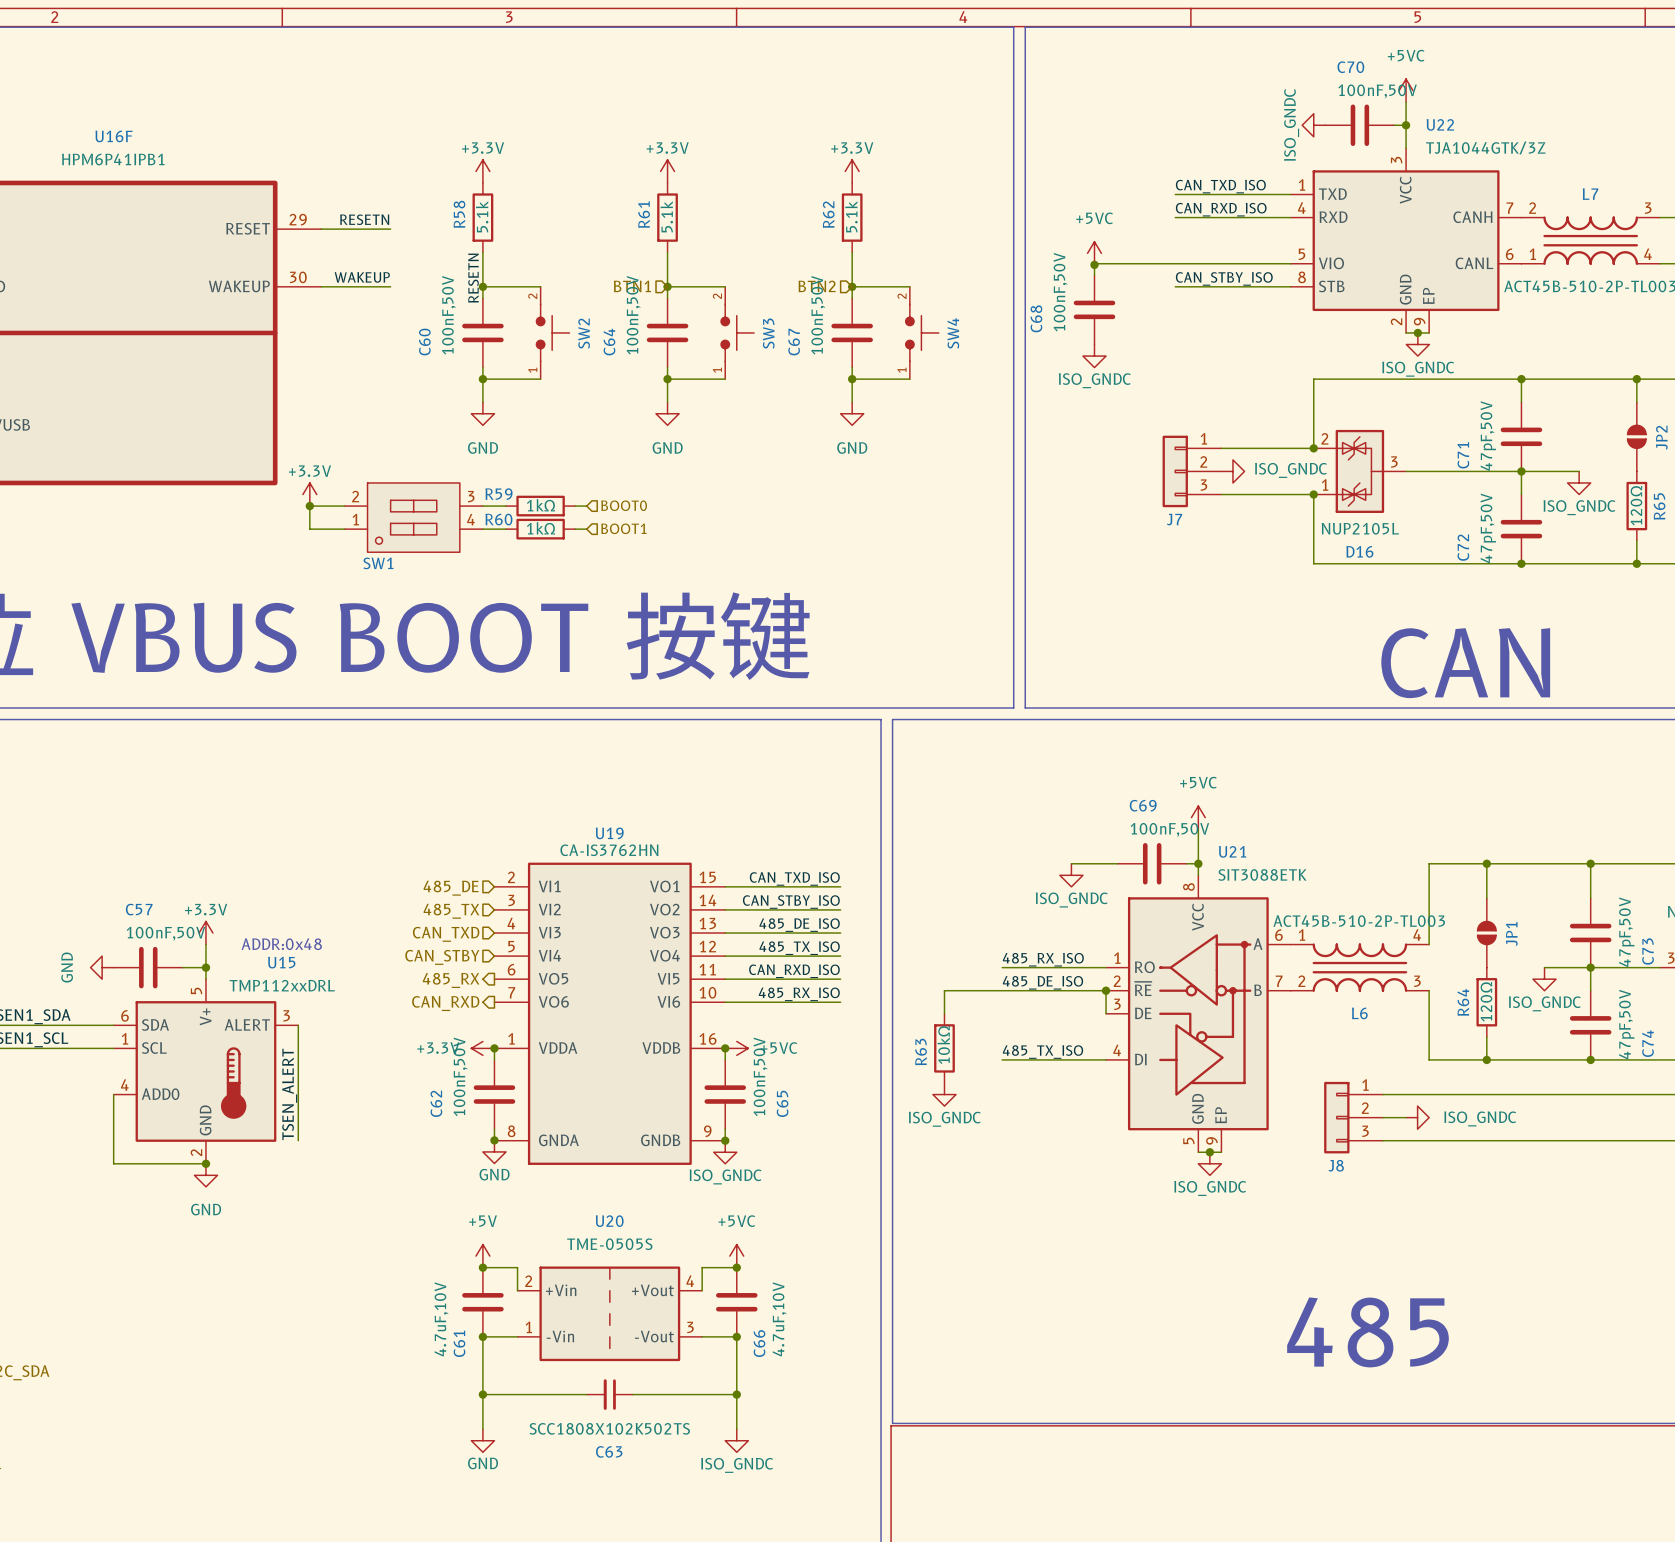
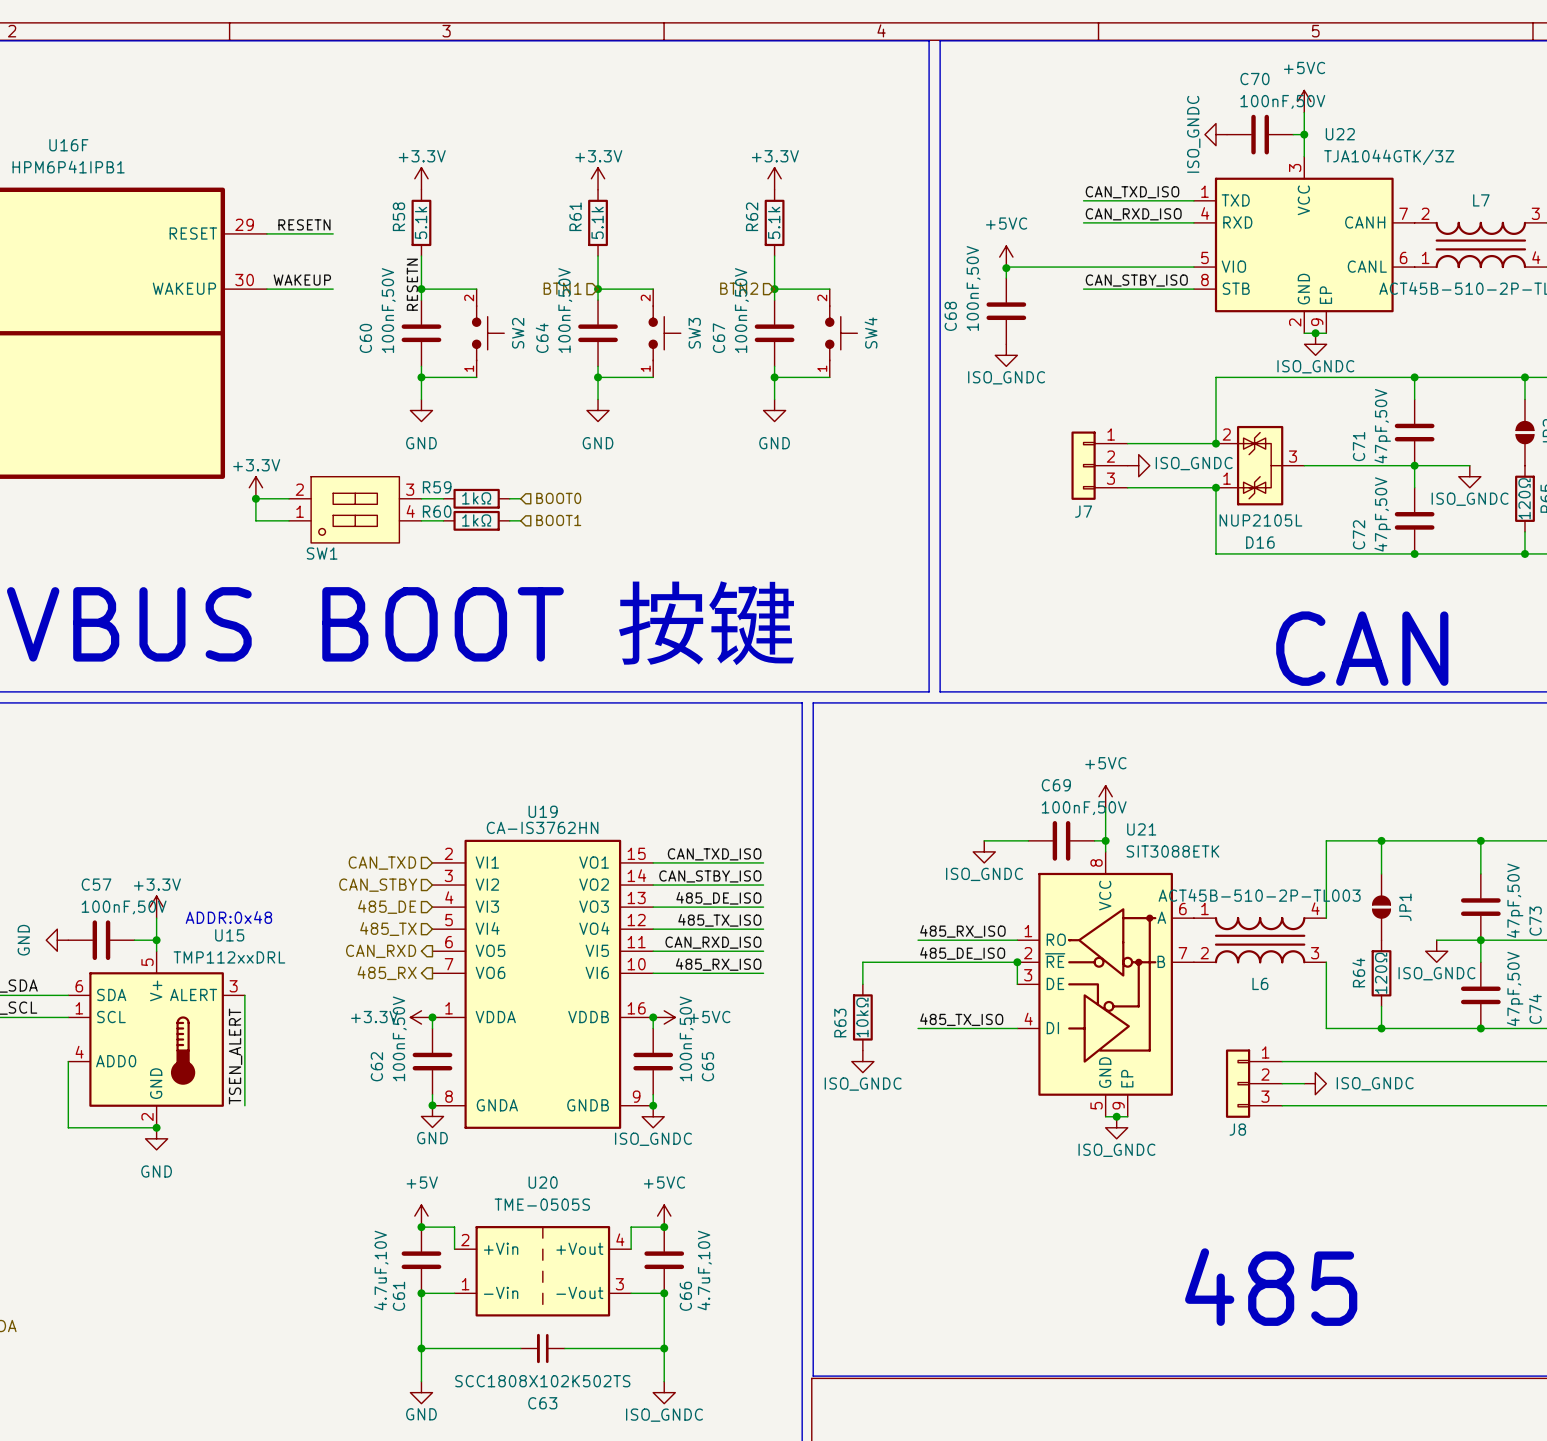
hierarchical label: 485_DE (451, 888) -> CAN_TXD (382, 863)
hierarchical label: 485_TX (451, 911) -> CAN_STBY (378, 885)
hierarchical label: CAN_TXD (446, 934) -> 485_DE (387, 906)
hierarchical label: CAN_STBY (442, 957) -> 485_TX (388, 929)
hierarchical label: 485_RX (451, 980) -> CAN_RXD (381, 951)
hierarchical label: CAN_RXD (445, 1003) -> 485_RX (387, 973)

